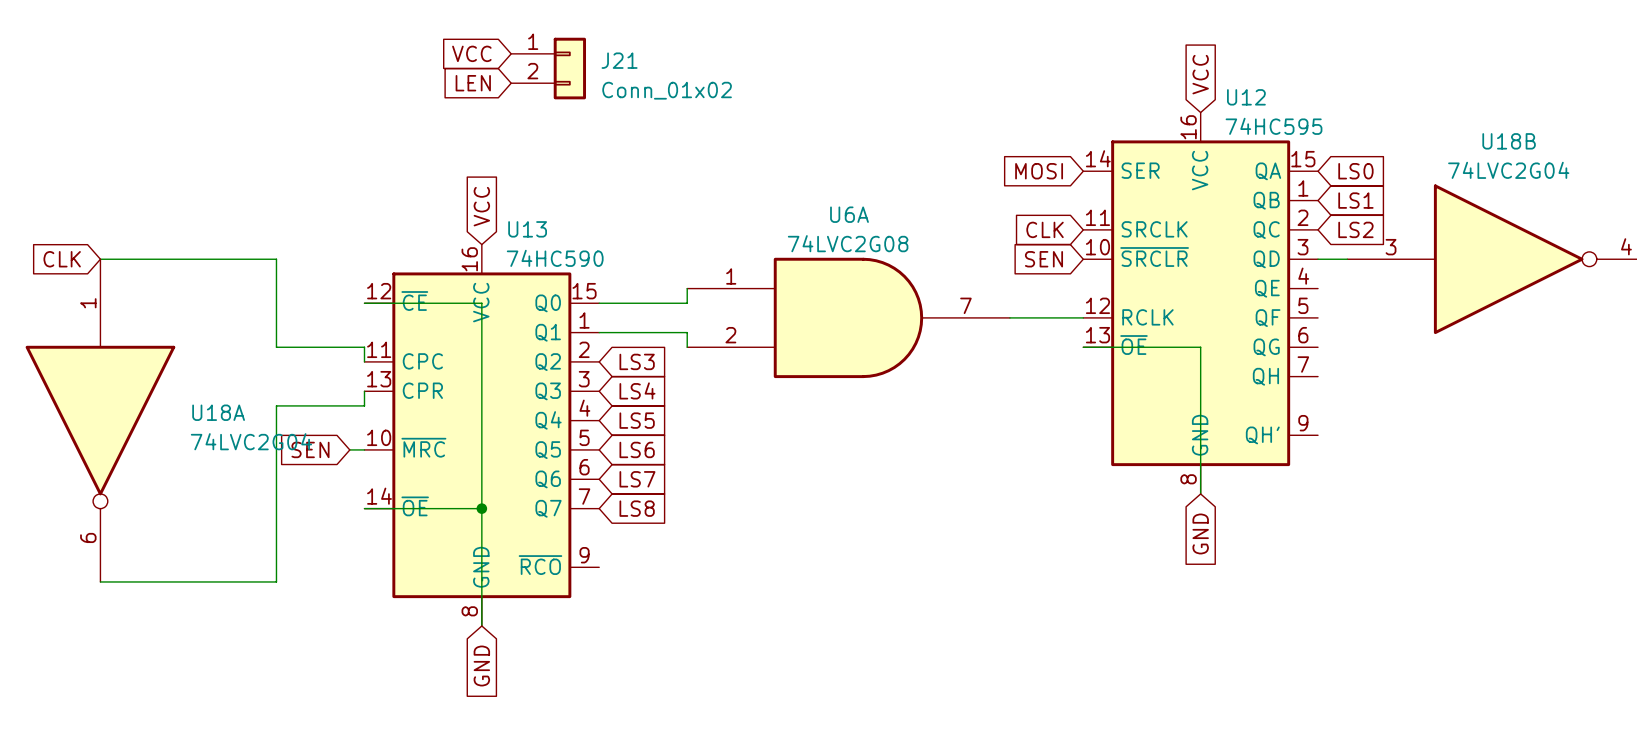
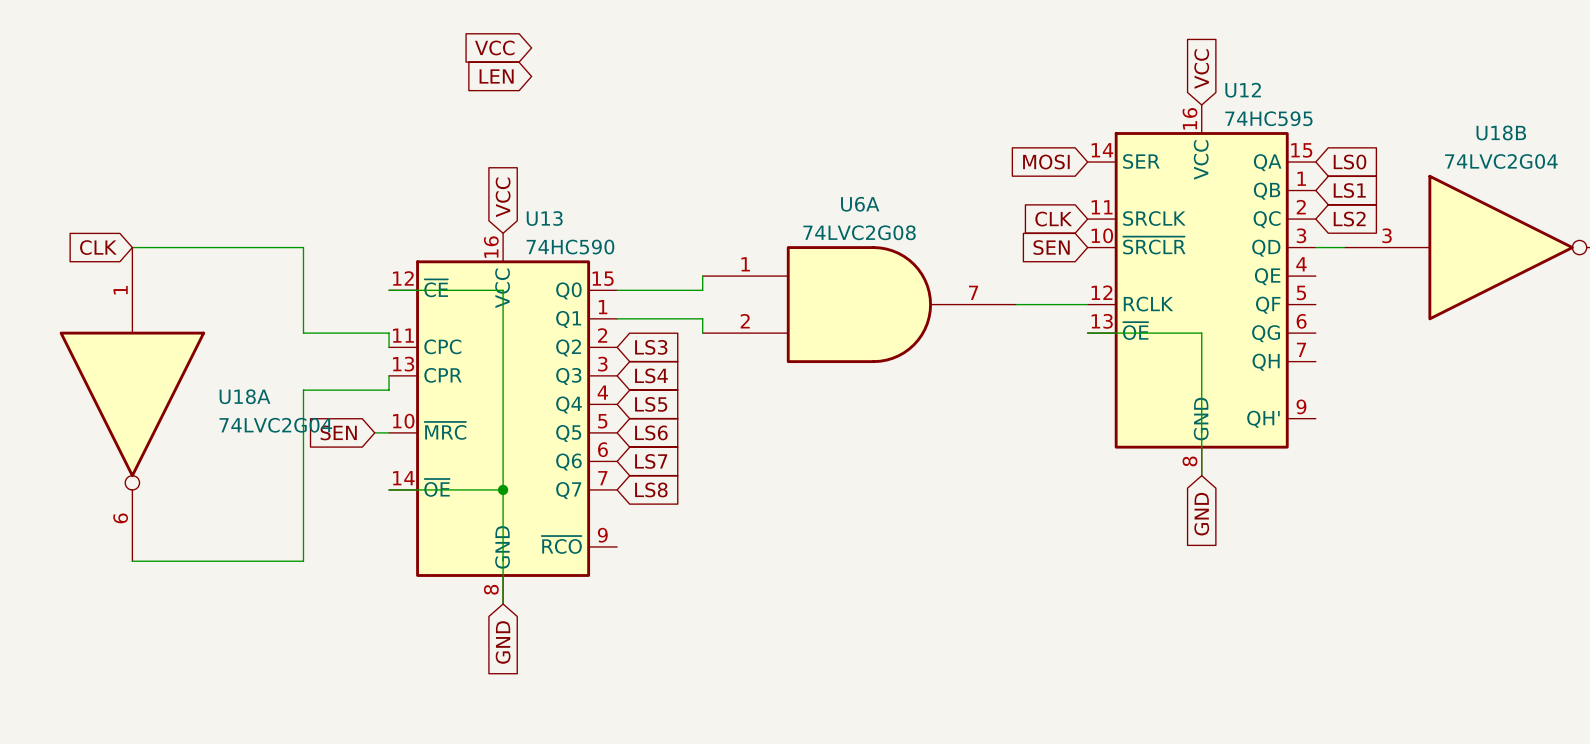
J21: Conn_01x02 (548, 68) -> none

